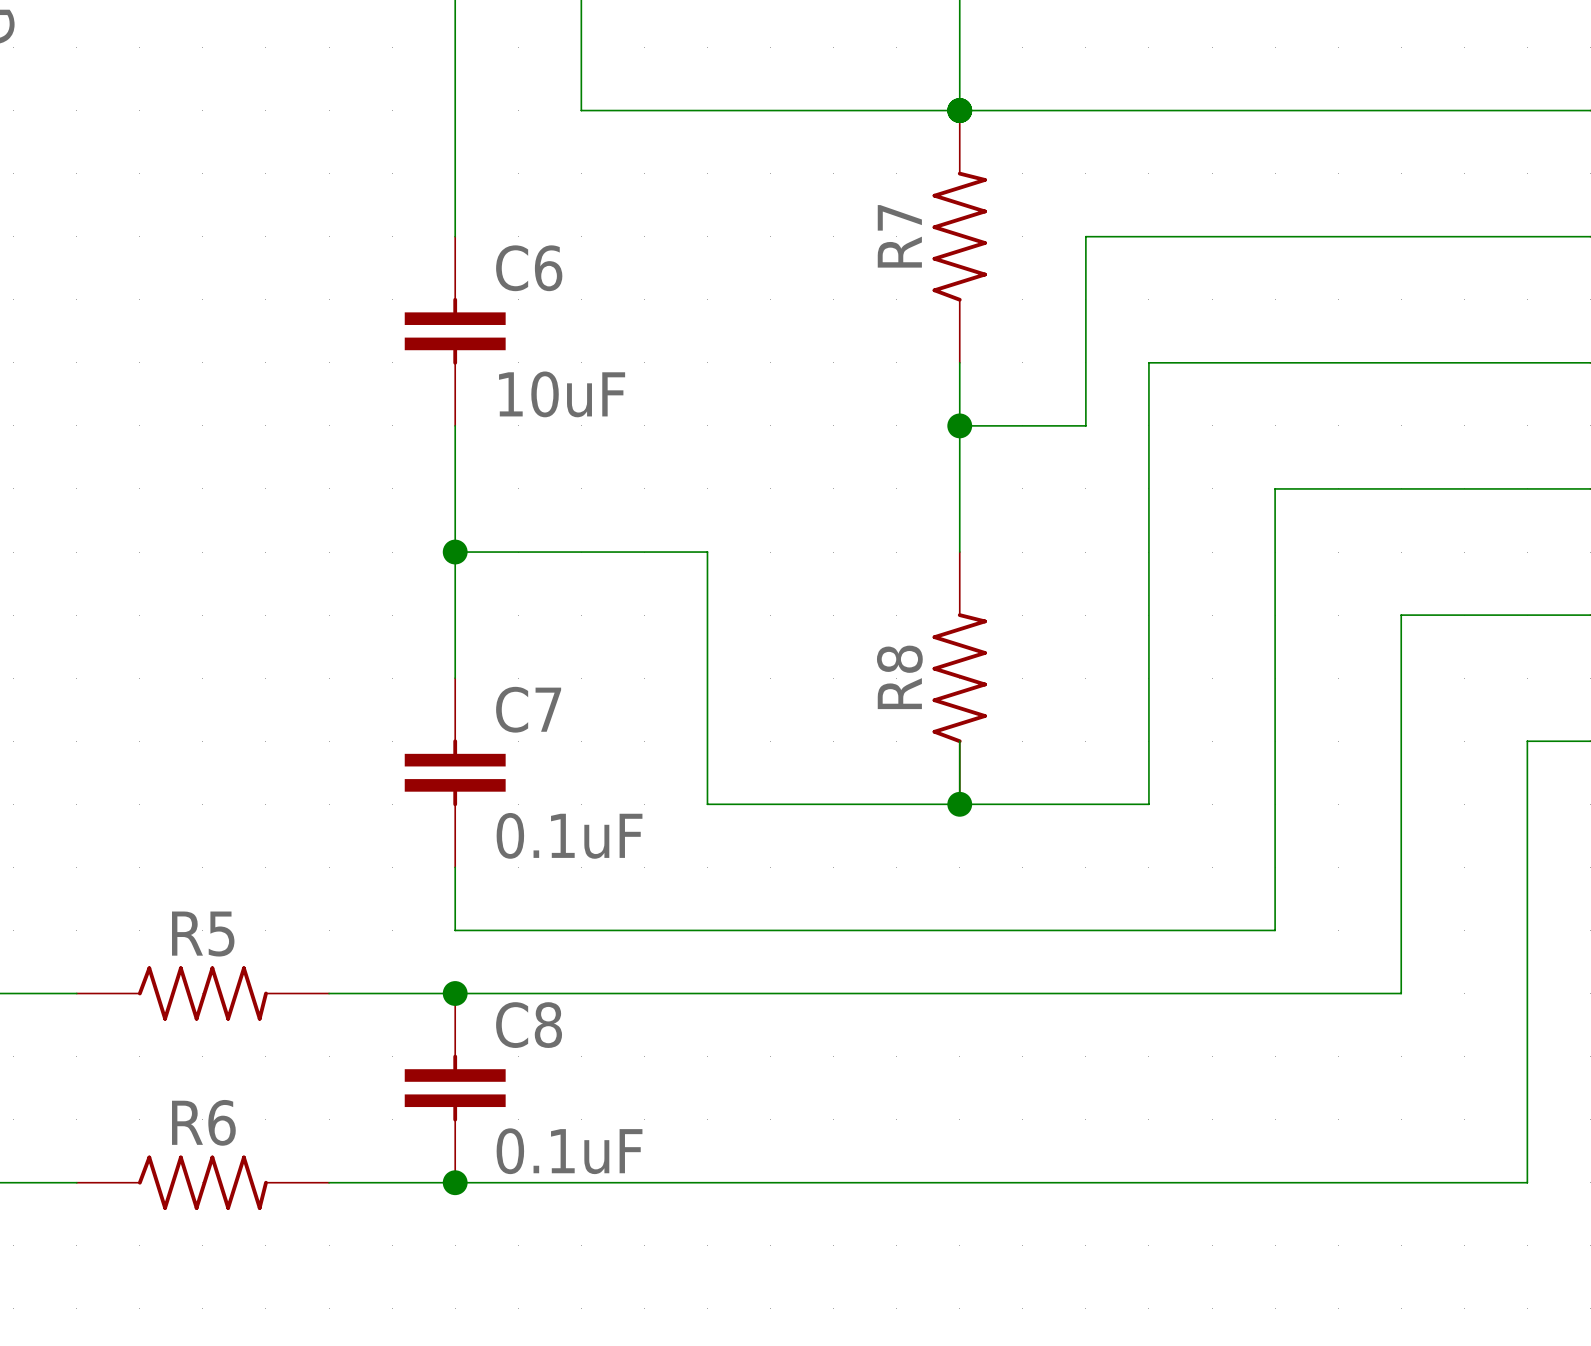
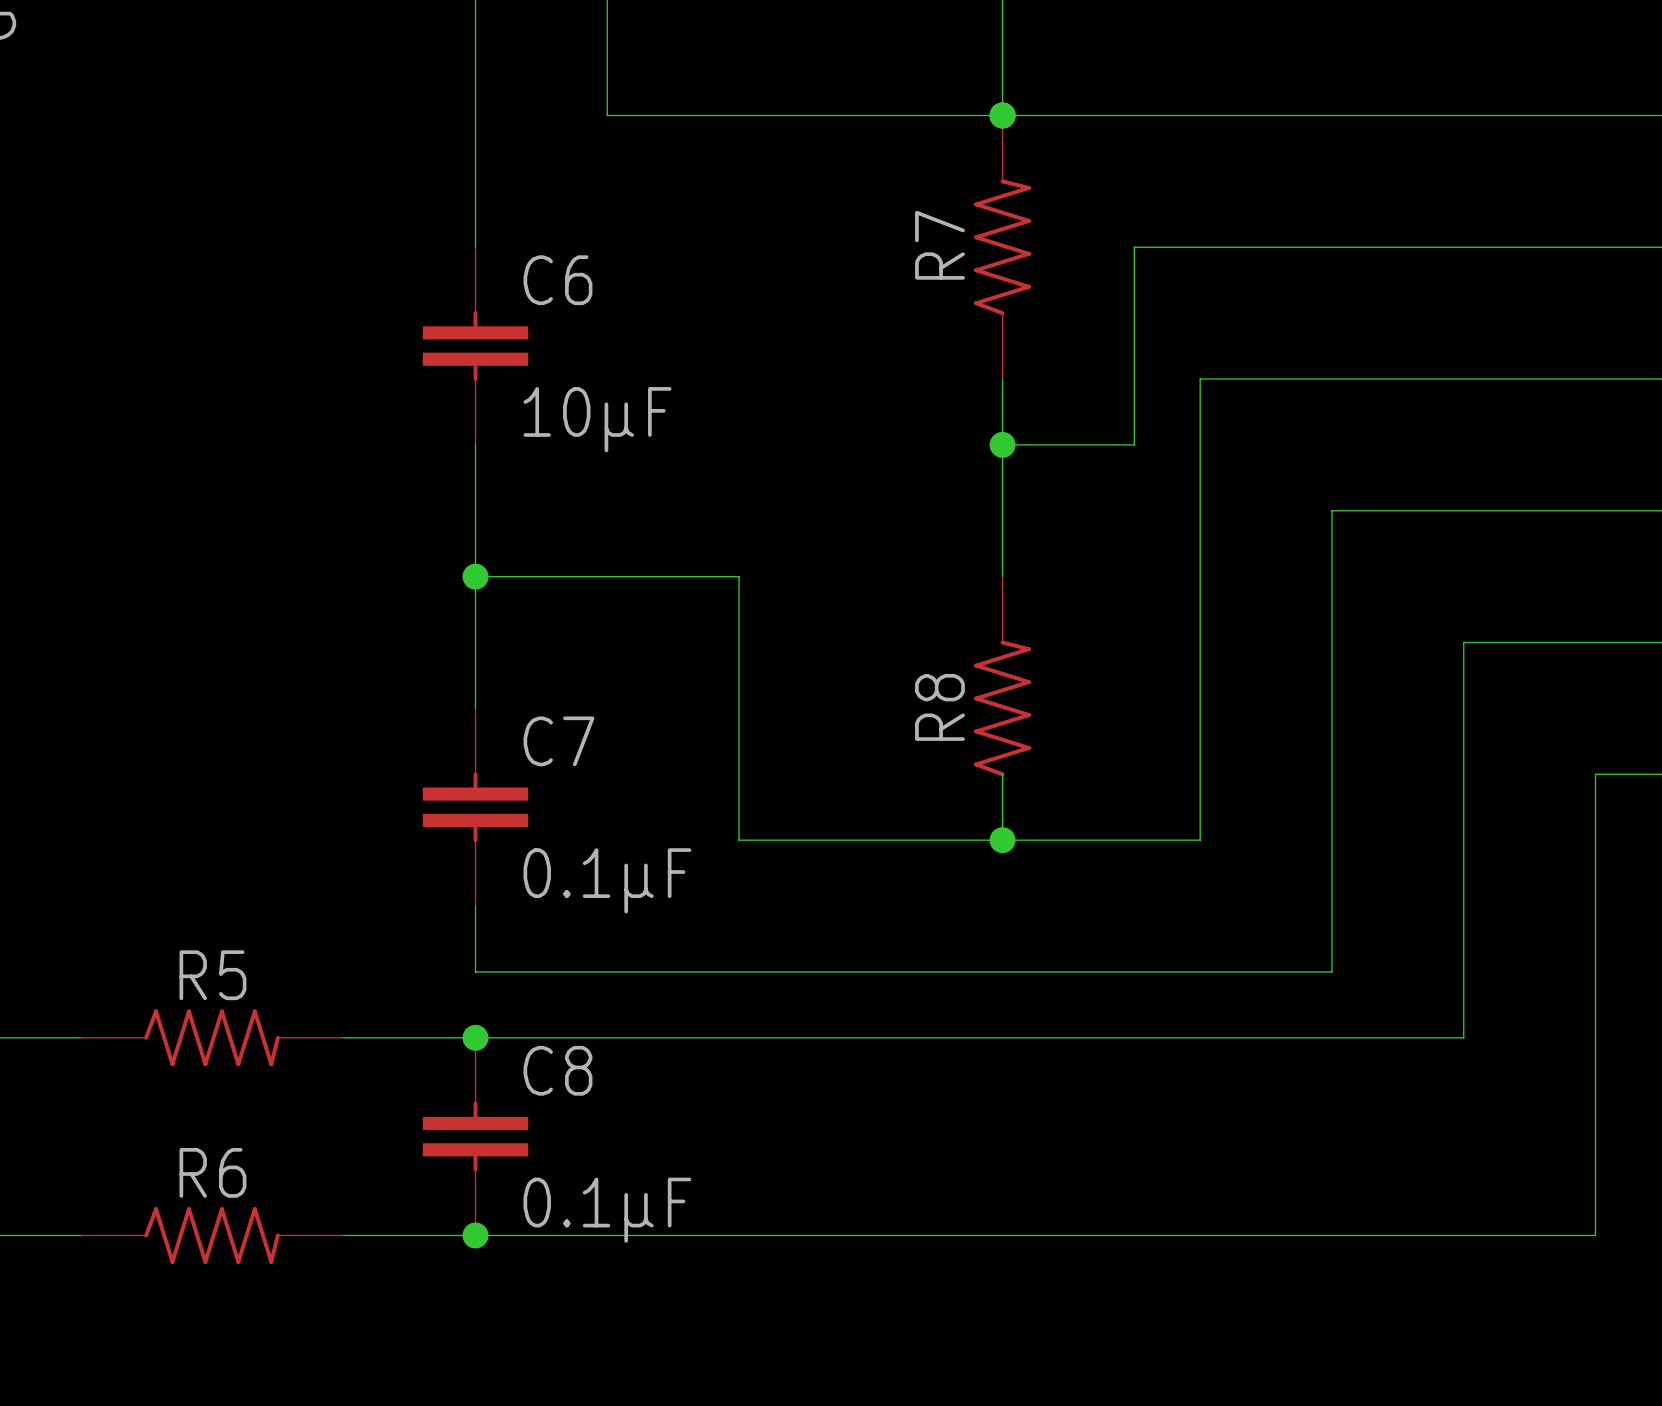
C6 value: 10uF (562, 394) -> 10µF (597, 419)
C7 value: 0.1uF (569, 835) -> 0.1µF (607, 880)
C8 value: 0.1uF (569, 1151) -> 0.1µF (607, 1210)

